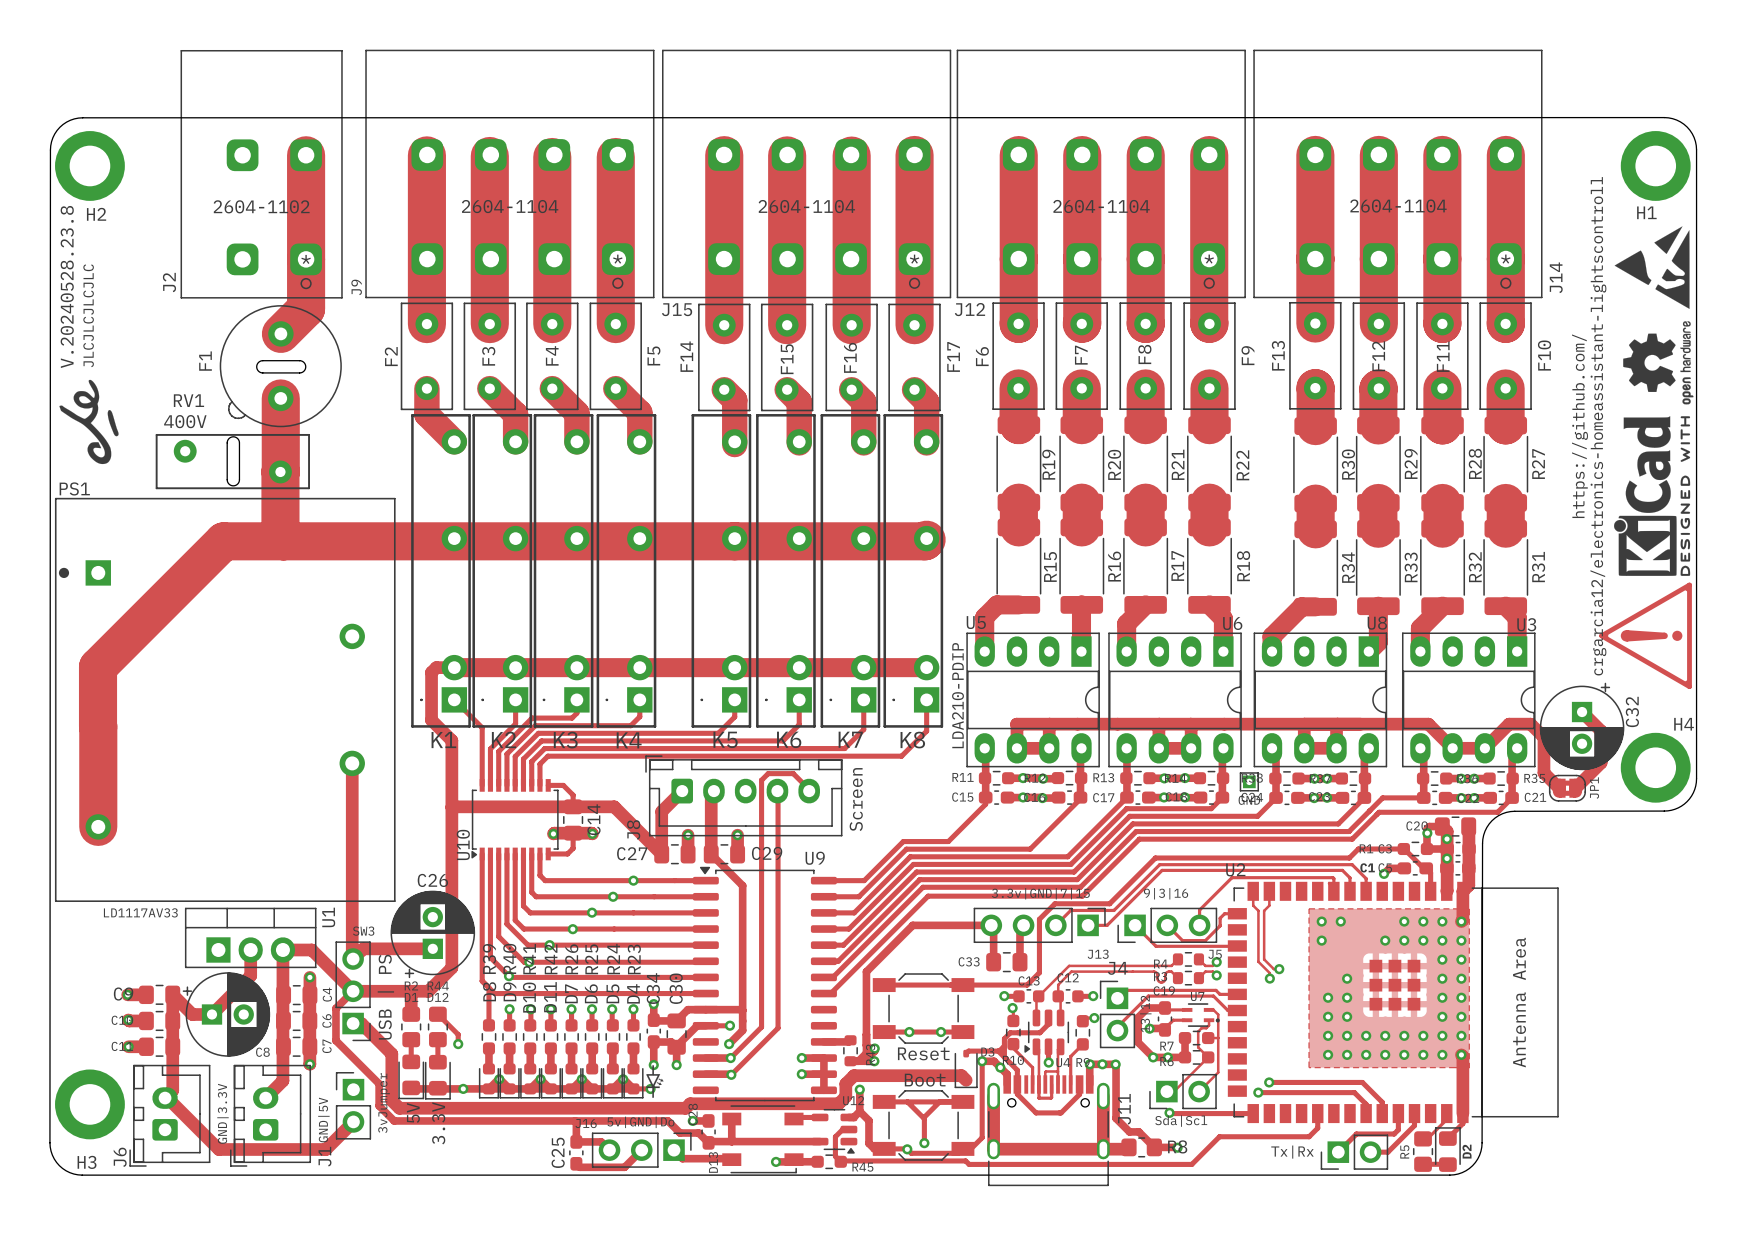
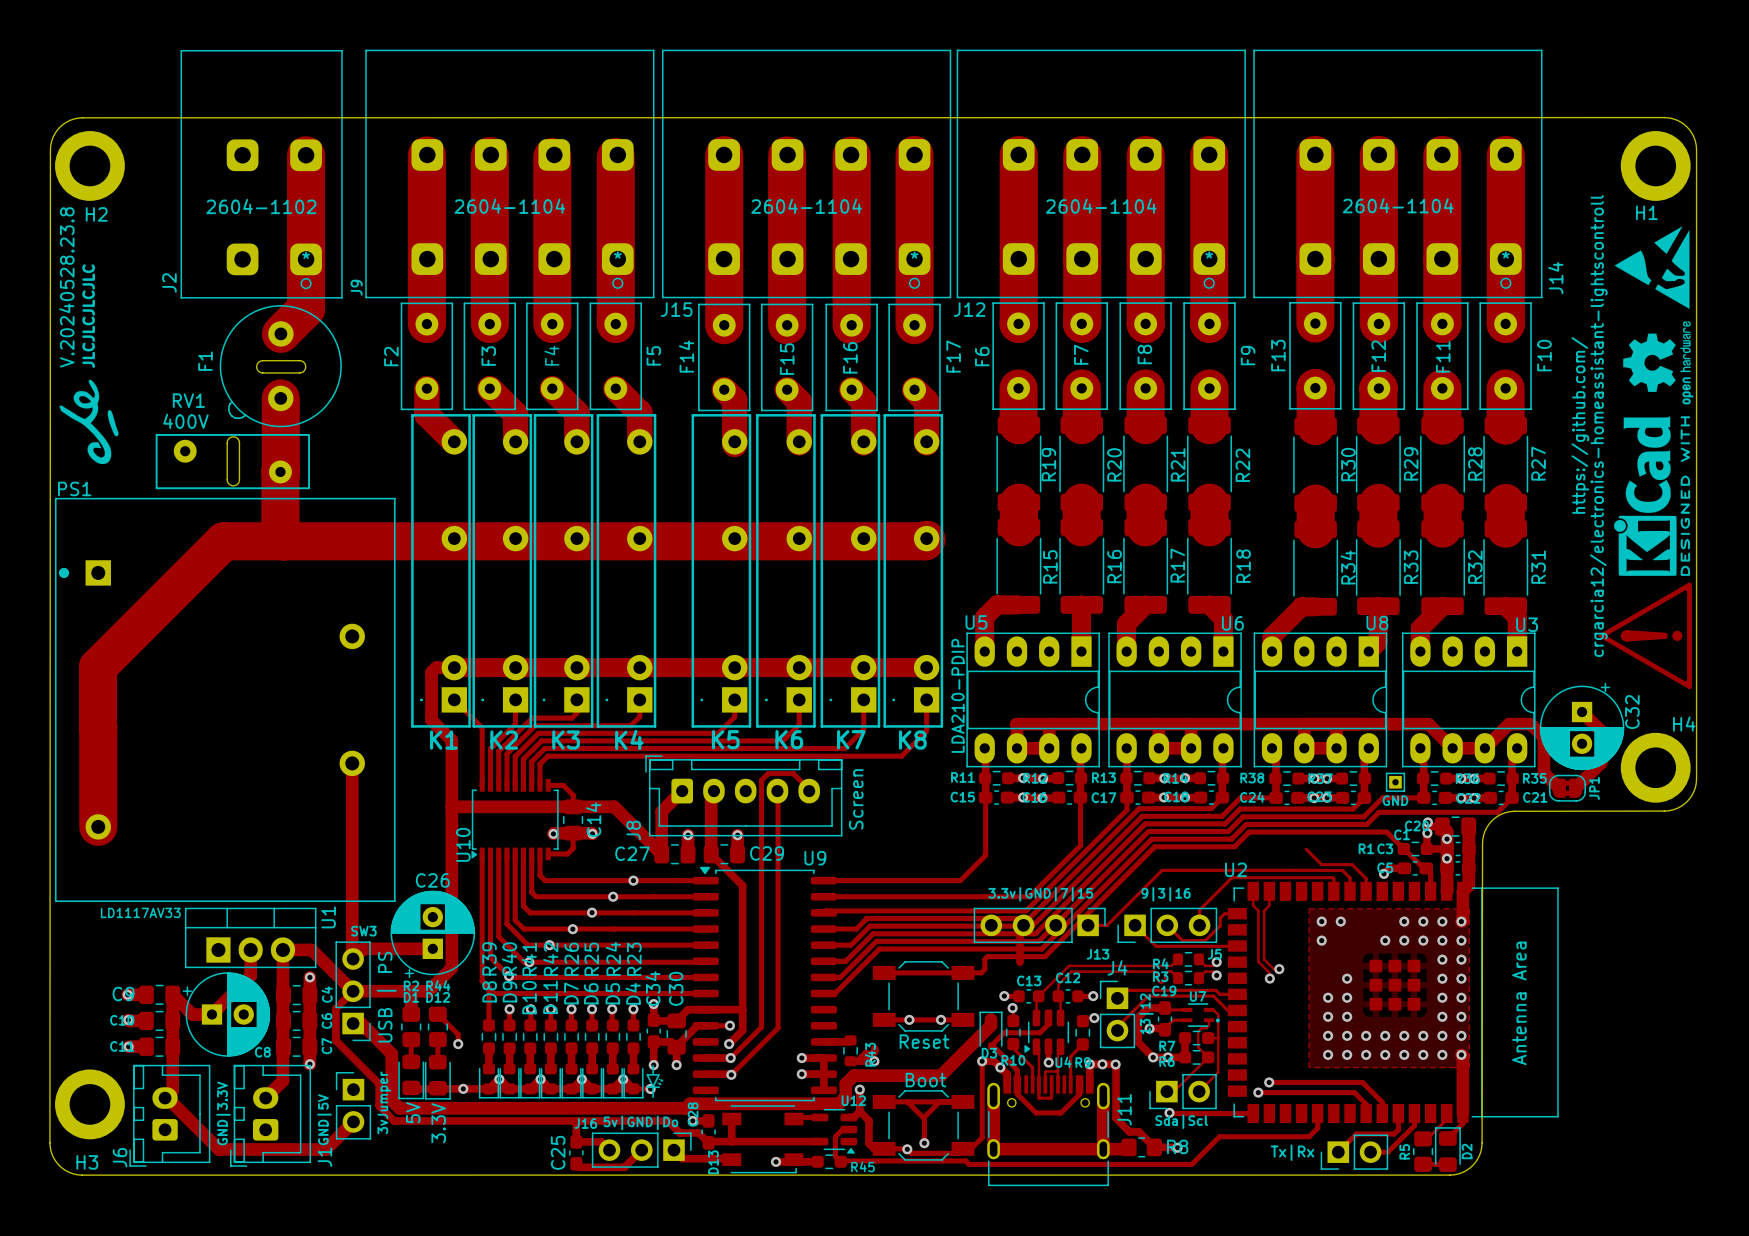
part position: (1249, 781) -> (1395, 782)
track: (1126, 797) (1067, 856) (910, 856) (854, 912) (823, 912) -> (1126, 797) (1126, 810) (1026, 910) (825, 910) (823, 912)
track: (1276, 797) (1257, 816) (1222, 816) -> (1276, 797) (1240, 797) (1222, 816)
track: (1080, 798) (1030, 849) (906, 849) (858, 896) -> (1080, 798) (1080, 845) (1029, 896) (858, 896)
track: (985, 804) (948, 841) (903, 841) (864, 880) -> (985, 804) (985, 855) (960, 880) (864, 880)
track: (1139, 808) (1126, 808) (1070, 864) (913, 864) (848, 929) -> (1139, 808) (1029, 918) (866, 918) (856, 929) (848, 929)
track: (1353, 808) (1338, 823) (1225, 823) -> (1353, 808) (1240, 808) (1225, 823)
track: (1142, 816) (1129, 816) (1074, 872) (916, 872) (843, 945) -> (1142, 816) (1032, 926) (870, 926) (851, 945) (843, 945)
track: (1363, 816) (1349, 831) (1228, 831) -> (1363, 816) (1243, 816) (1228, 831)
via: none -> (1427, 822)
track: (1145, 823) (1132, 823) (1077, 879) (919, 879) (838, 961) -> (1145, 823) (1035, 933) (873, 933) (845, 961) (838, 961)
track: (1366, 824) (1352, 839) (1231, 839) -> (1366, 824) (1246, 824) (1231, 839)
track: (1148, 831) (1136, 831) (1080, 887) (922, 887) (832, 977) -> (1148, 831) (1038, 941) (876, 941) (840, 977) (832, 977)
track: (1151, 839) (1139, 839) (1082, 896) (928, 896) (830, 993) -> (1151, 839) (1041, 949) (879, 949) (835, 993) (830, 993)
track: (1403, 849) (1358, 849) (1349, 858) (1155, 858) (1109, 903) (1054, 903) (1039, 919) (1039, 972) (1027, 985) (884, 985) -> (1403, 849) (1386, 832) (1249, 832) (1234, 846) (1154, 846) (1044, 956) (987, 956) (984, 959) (984, 969) (981, 972) (884, 972)
track: (1321, 864) (1159, 864) (1113, 910) (1070, 910) (1055, 925) -> (1321, 864) (1306, 849)
C1 name position: C1 (1367, 867) -> C1 (1402, 834)
track: (993, 962) (993, 927) (991, 925) (912, 925) (866, 971) (866, 1053) (874, 1061) -> none
C33: (1006, 962) -> none
part position: (923, 1008) -> (923, 996)
track: (884, 1032) (962, 1032) -> (884, 1019) (962, 1019)
via position: (909, 1032) -> (909, 1019)
via position: (941, 1032) -> (941, 1019)
track: (1010, 1032) (1004, 1038) (1004, 1057) -> (1010, 1032) (1004, 1032) (991, 1046) (998, 1051)
track: (1004, 1046) (999, 1051) (968, 1051) (966, 1053) -> none
via: (874, 1048) -> none
D3 rotation: 0° (966, 1068) -> 180° (991, 1030)
D3 position: (966, 1068) -> (991, 1030)
track: (940, 1075) (961, 1075) (966, 1080) -> (940, 1075) (991, 1025) (991, 1019)

